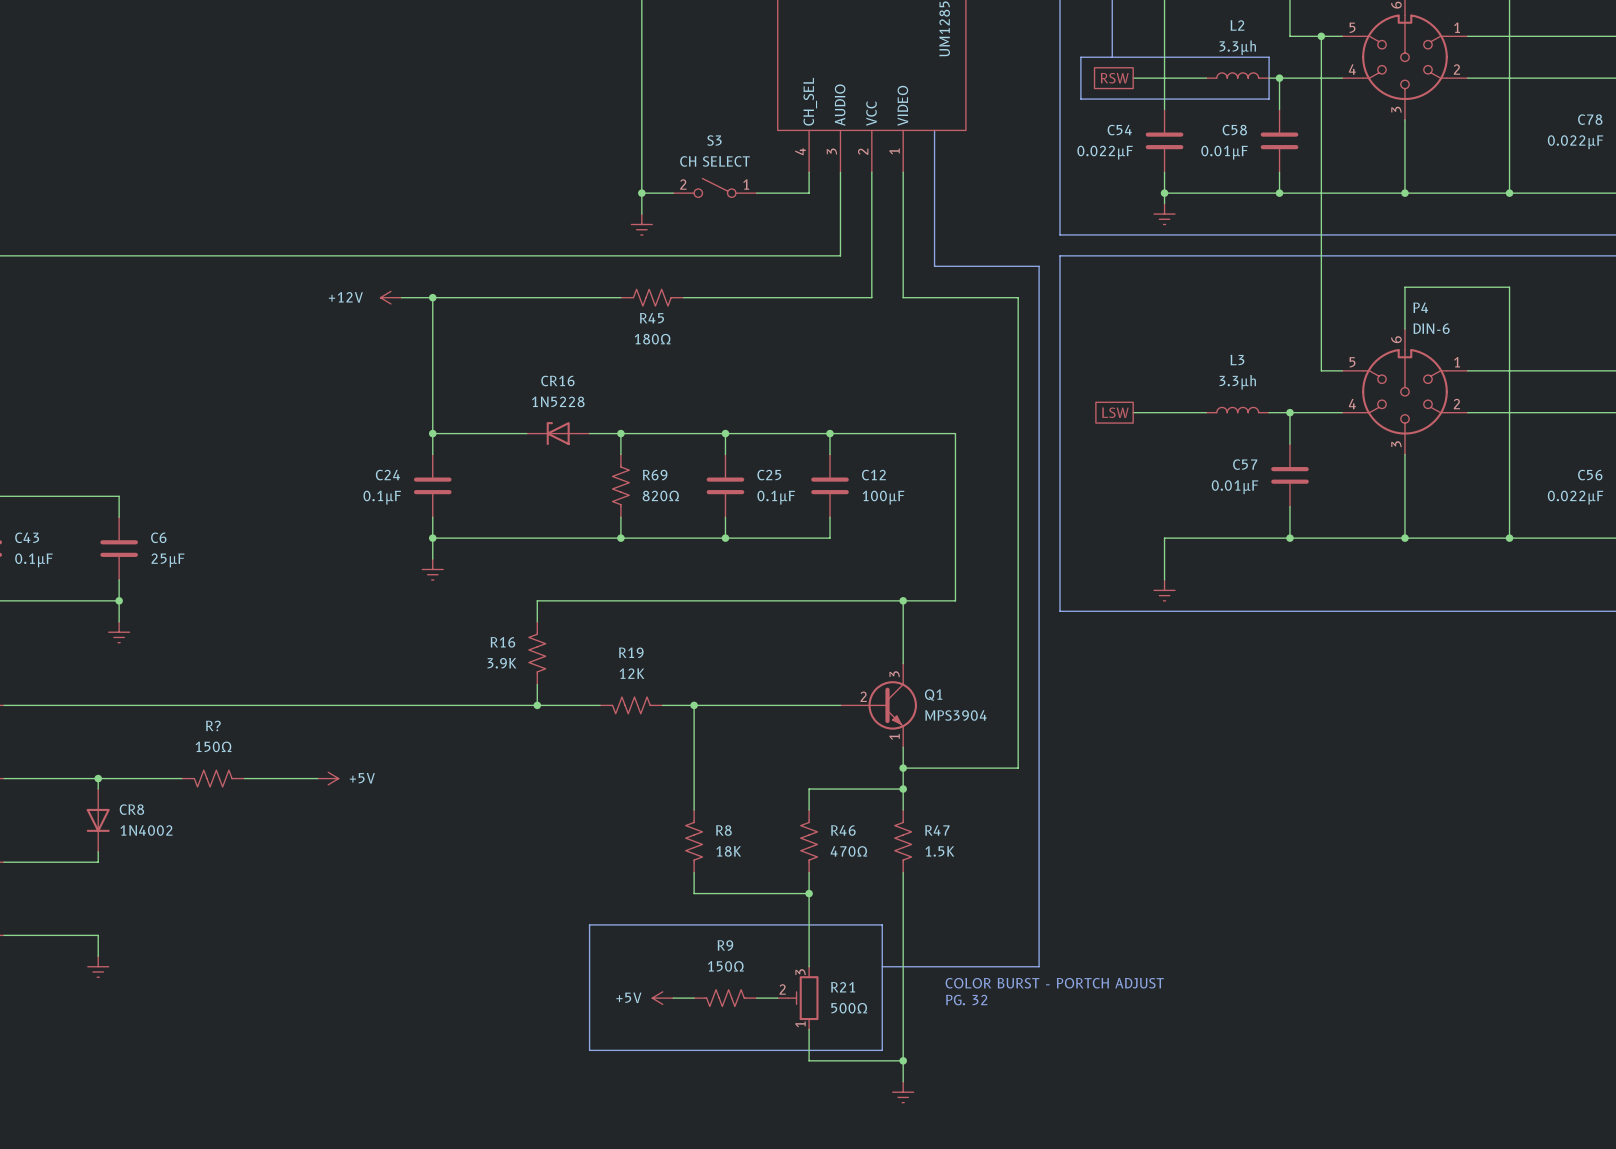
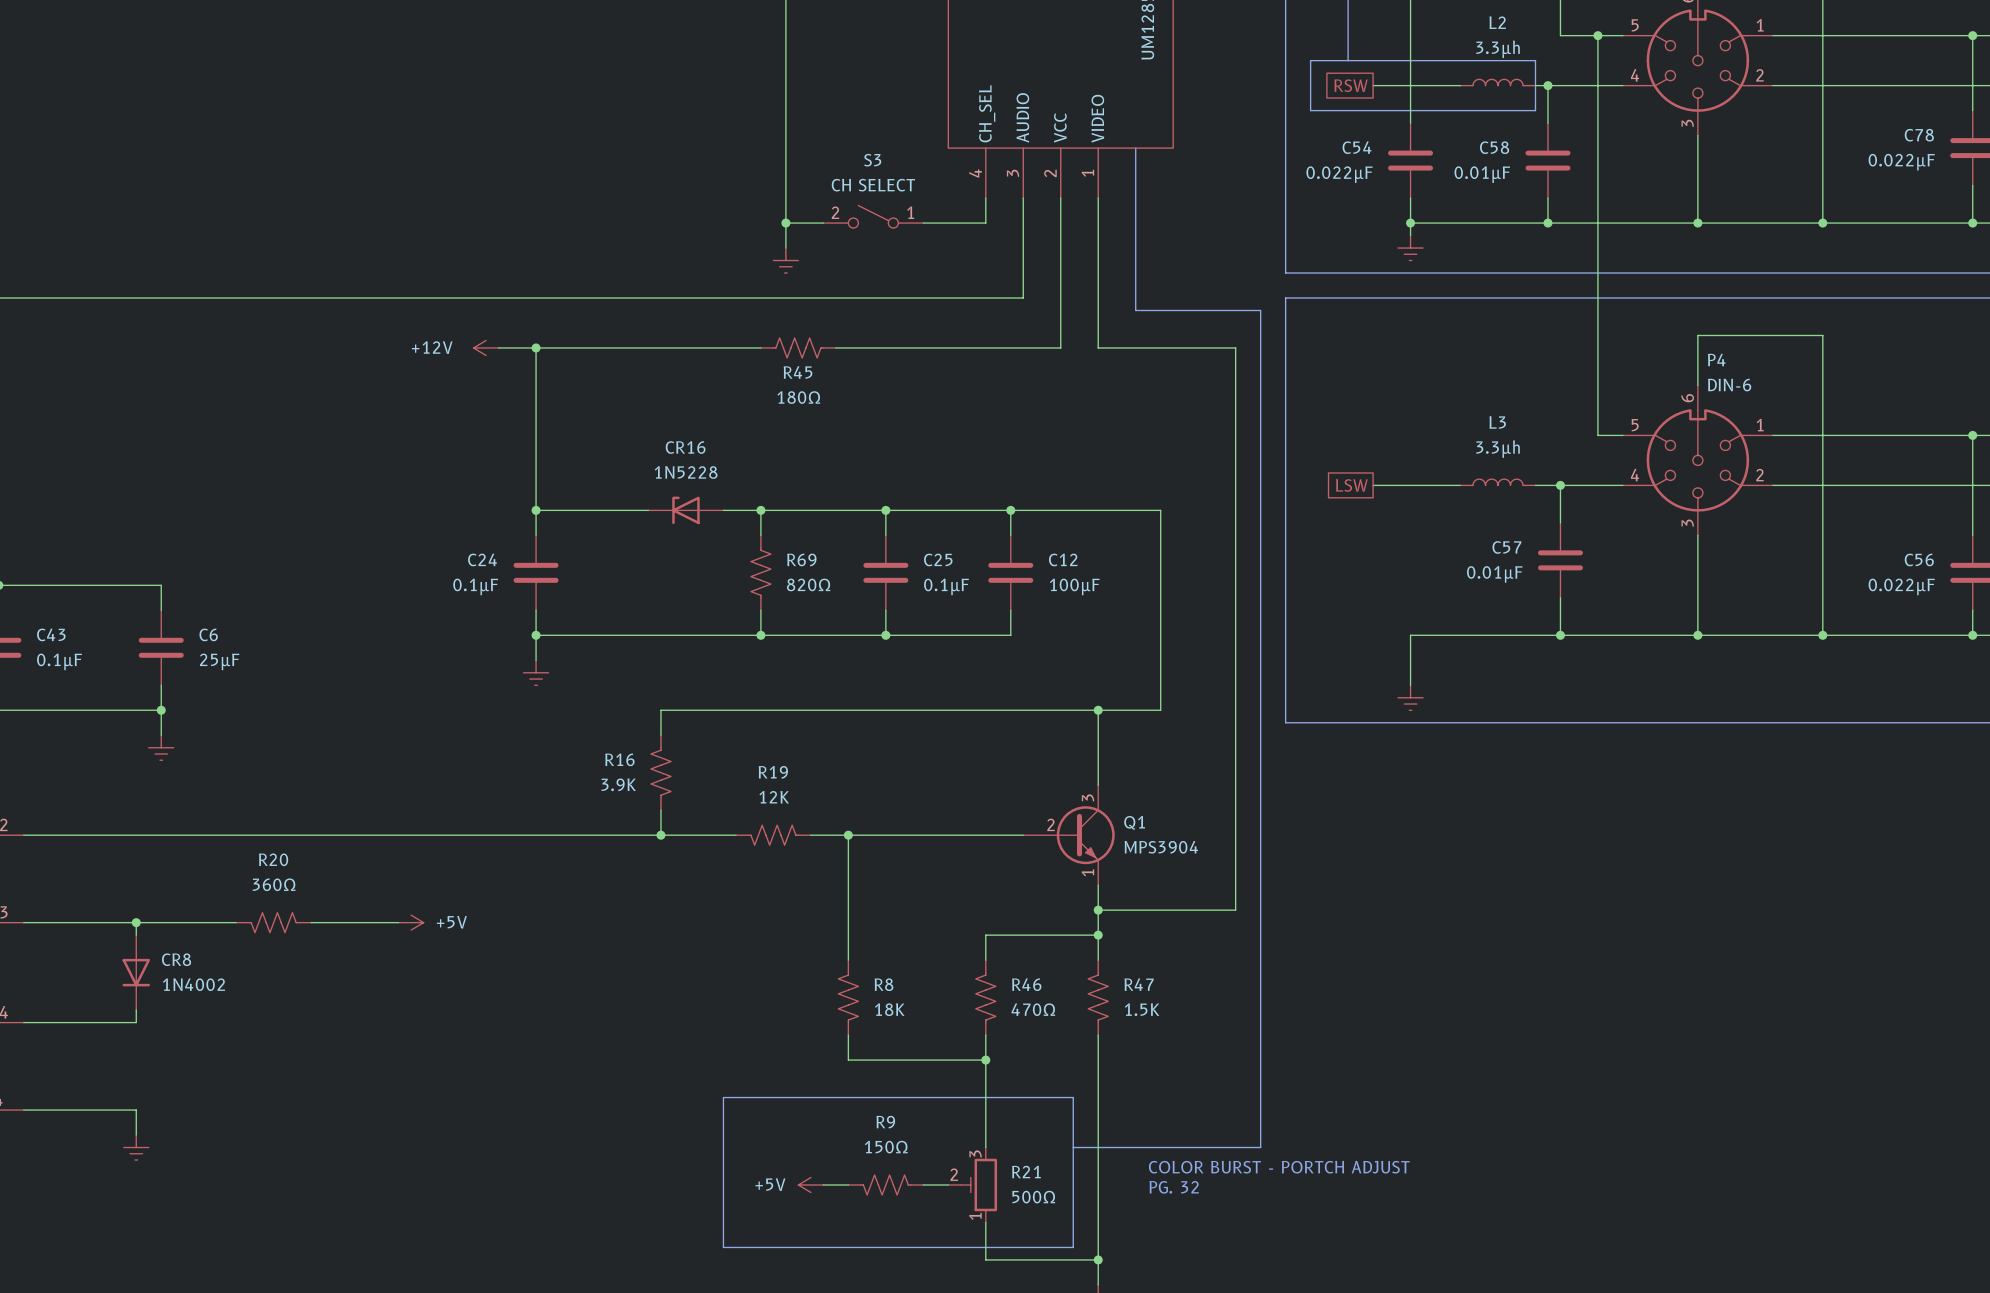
R? name: R? (213, 725) -> R20 (273, 859)
R? value: 150Ω (213, 746) -> 360Ω (274, 884)

